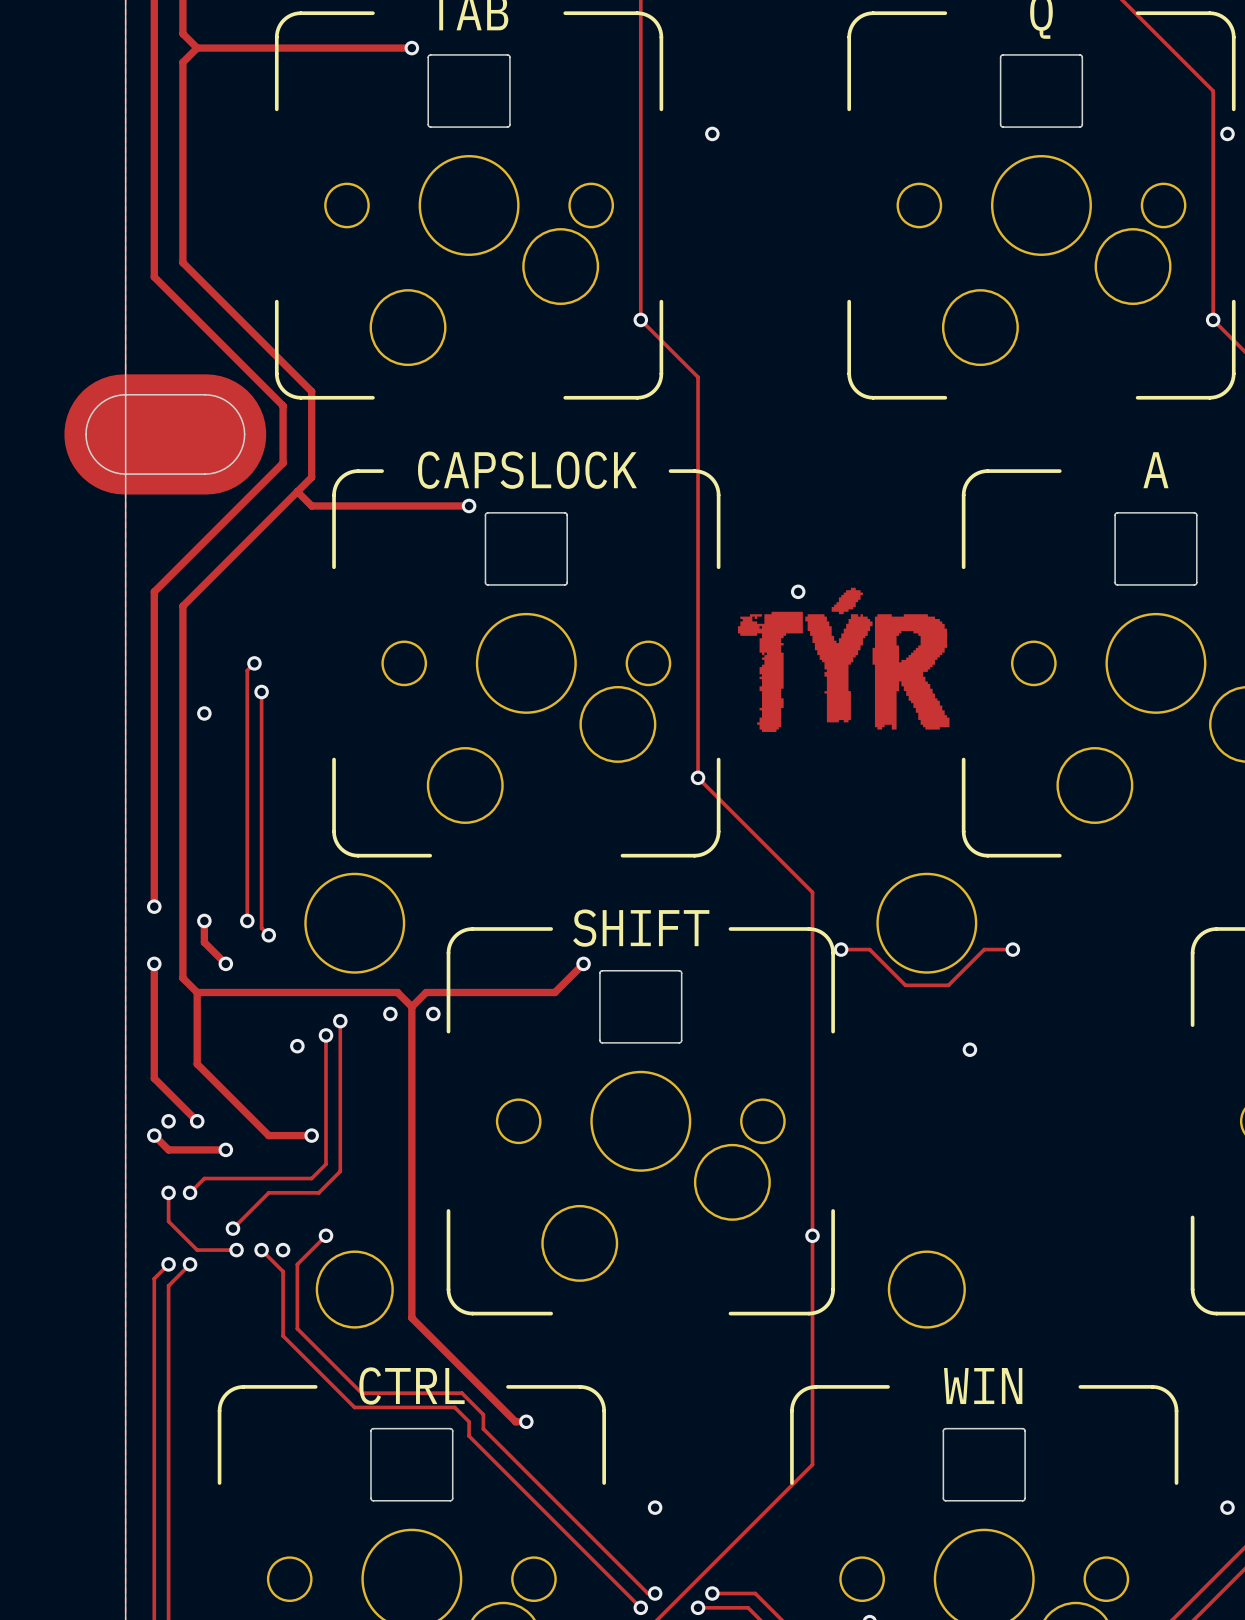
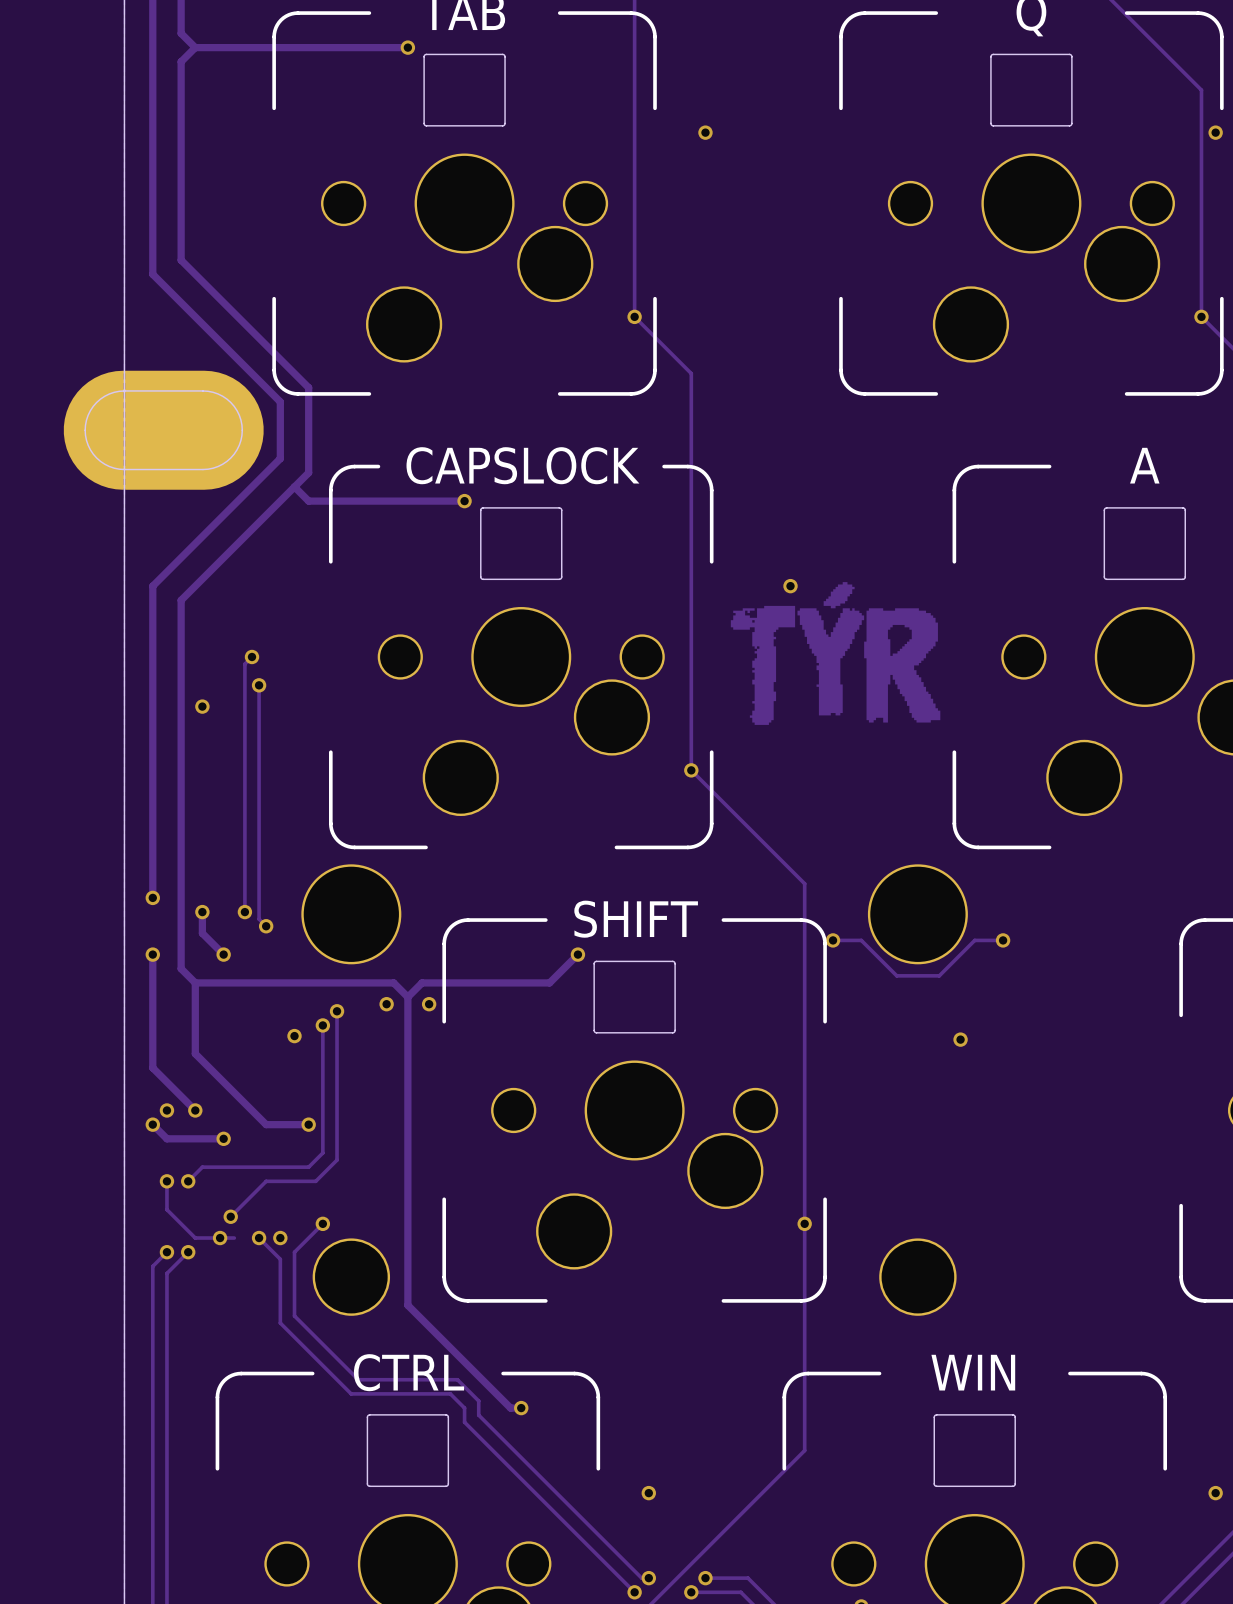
via position: (236, 1250) -> (220, 1238)

